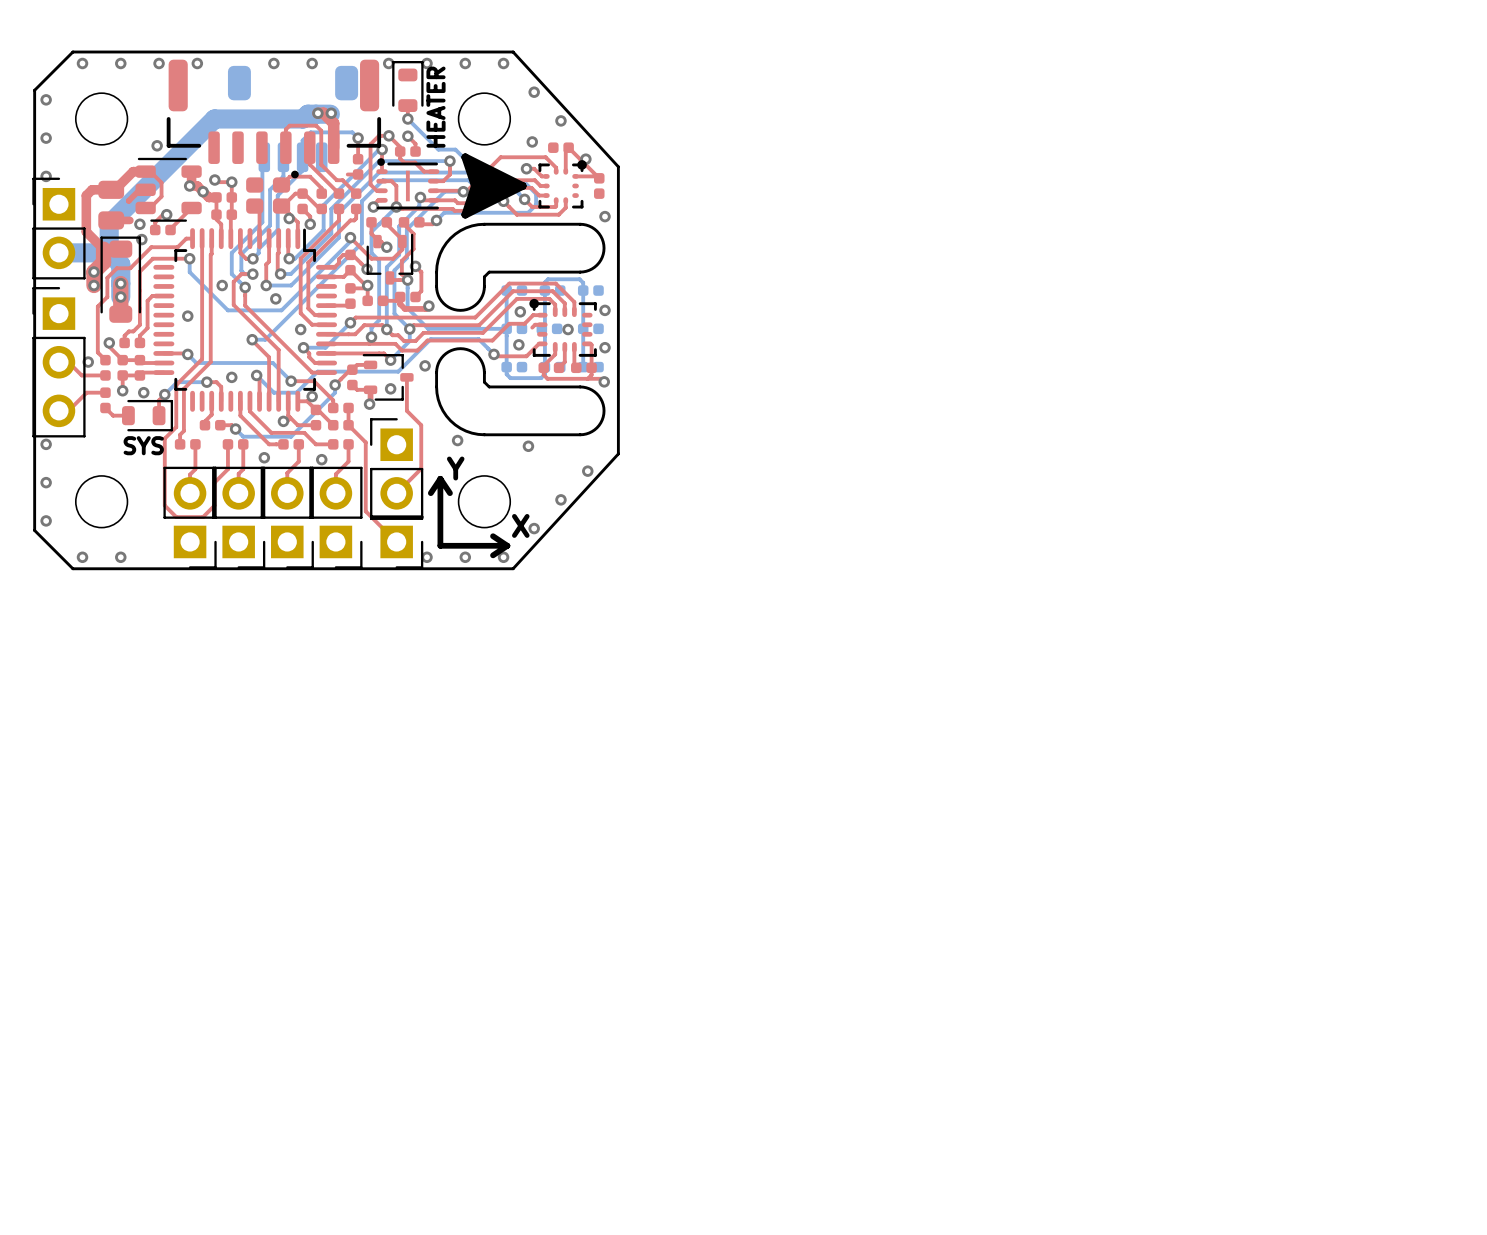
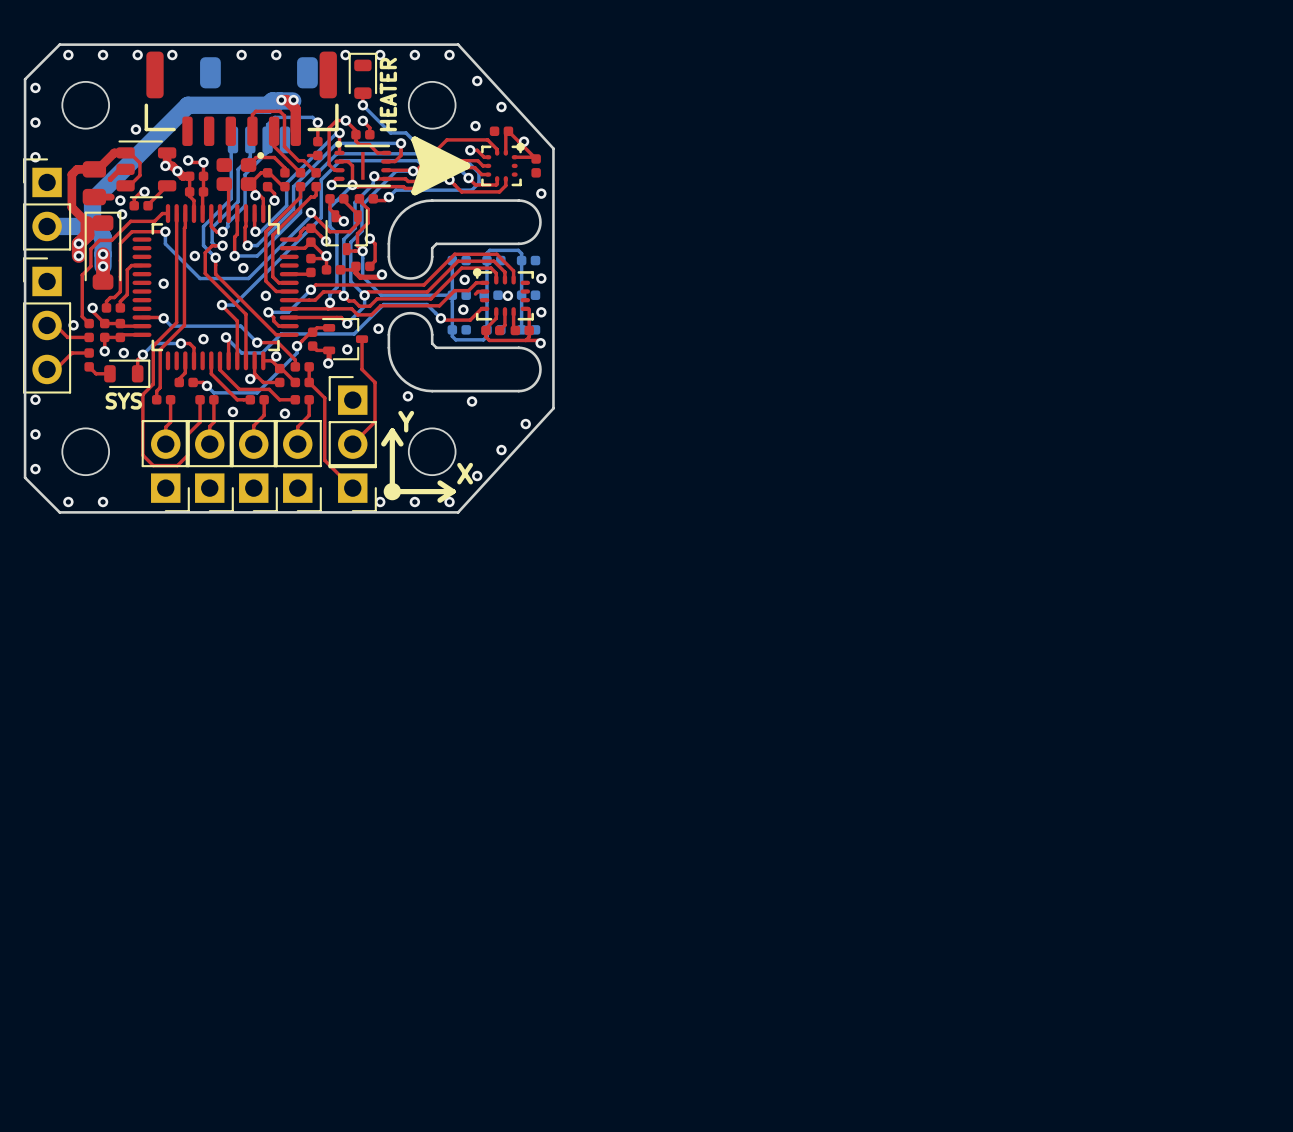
drawing: none -> [383, 482, 402, 501]

